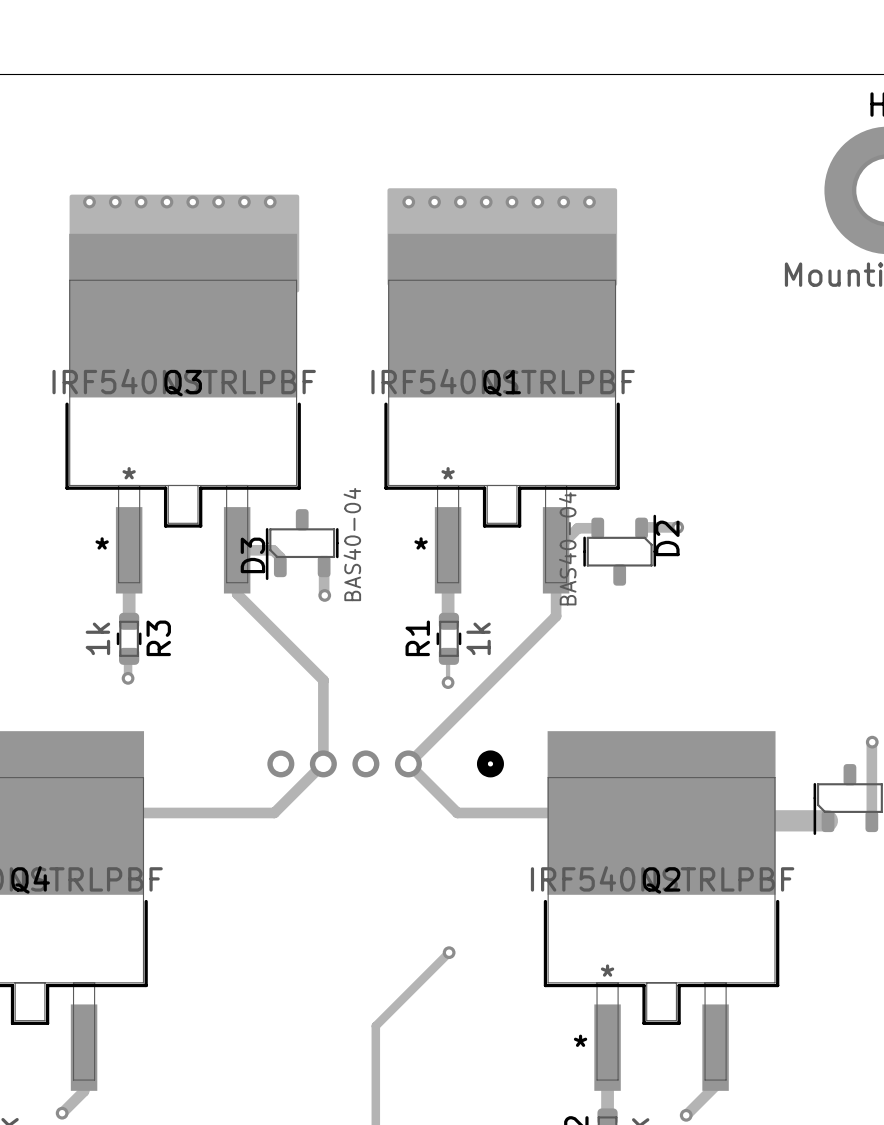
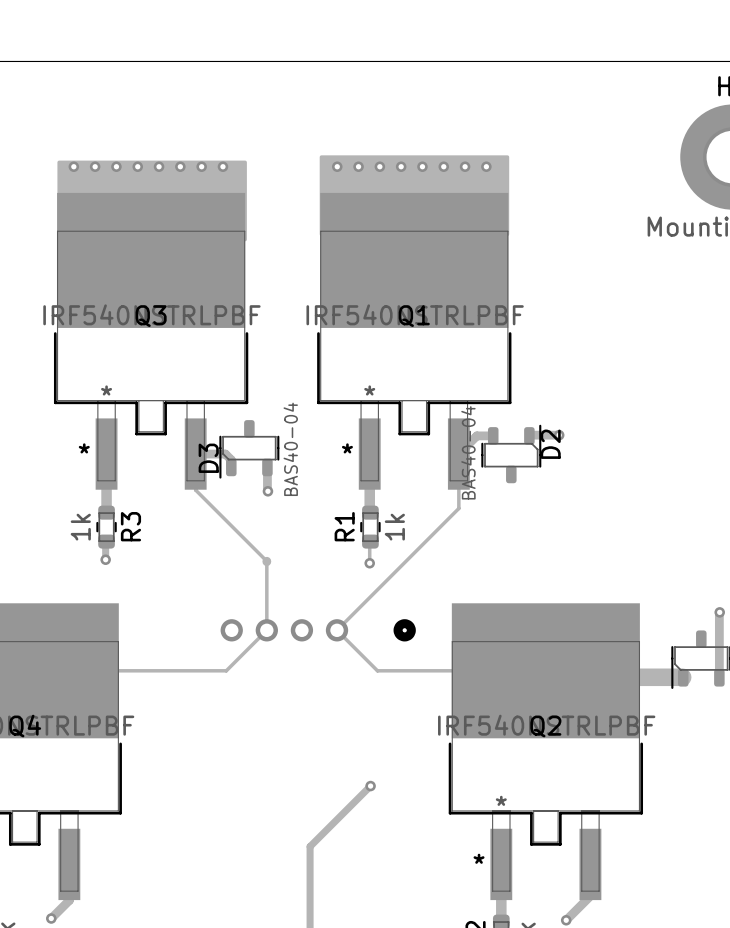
track width: thick (237, 550) (237, 593) (323, 680) -> thin (195, 454) (195, 490) (266, 561)
track width: thick (556, 550) (556, 616) (408, 763) (457, 812) (661, 812) -> thin (458, 454) (458, 508) (337, 630) (377, 670) (545, 670)
track width: thick (323, 680) (323, 763) (274, 812) (30, 812) -> thin (266, 561) (266, 630) (226, 670) (24, 670)

